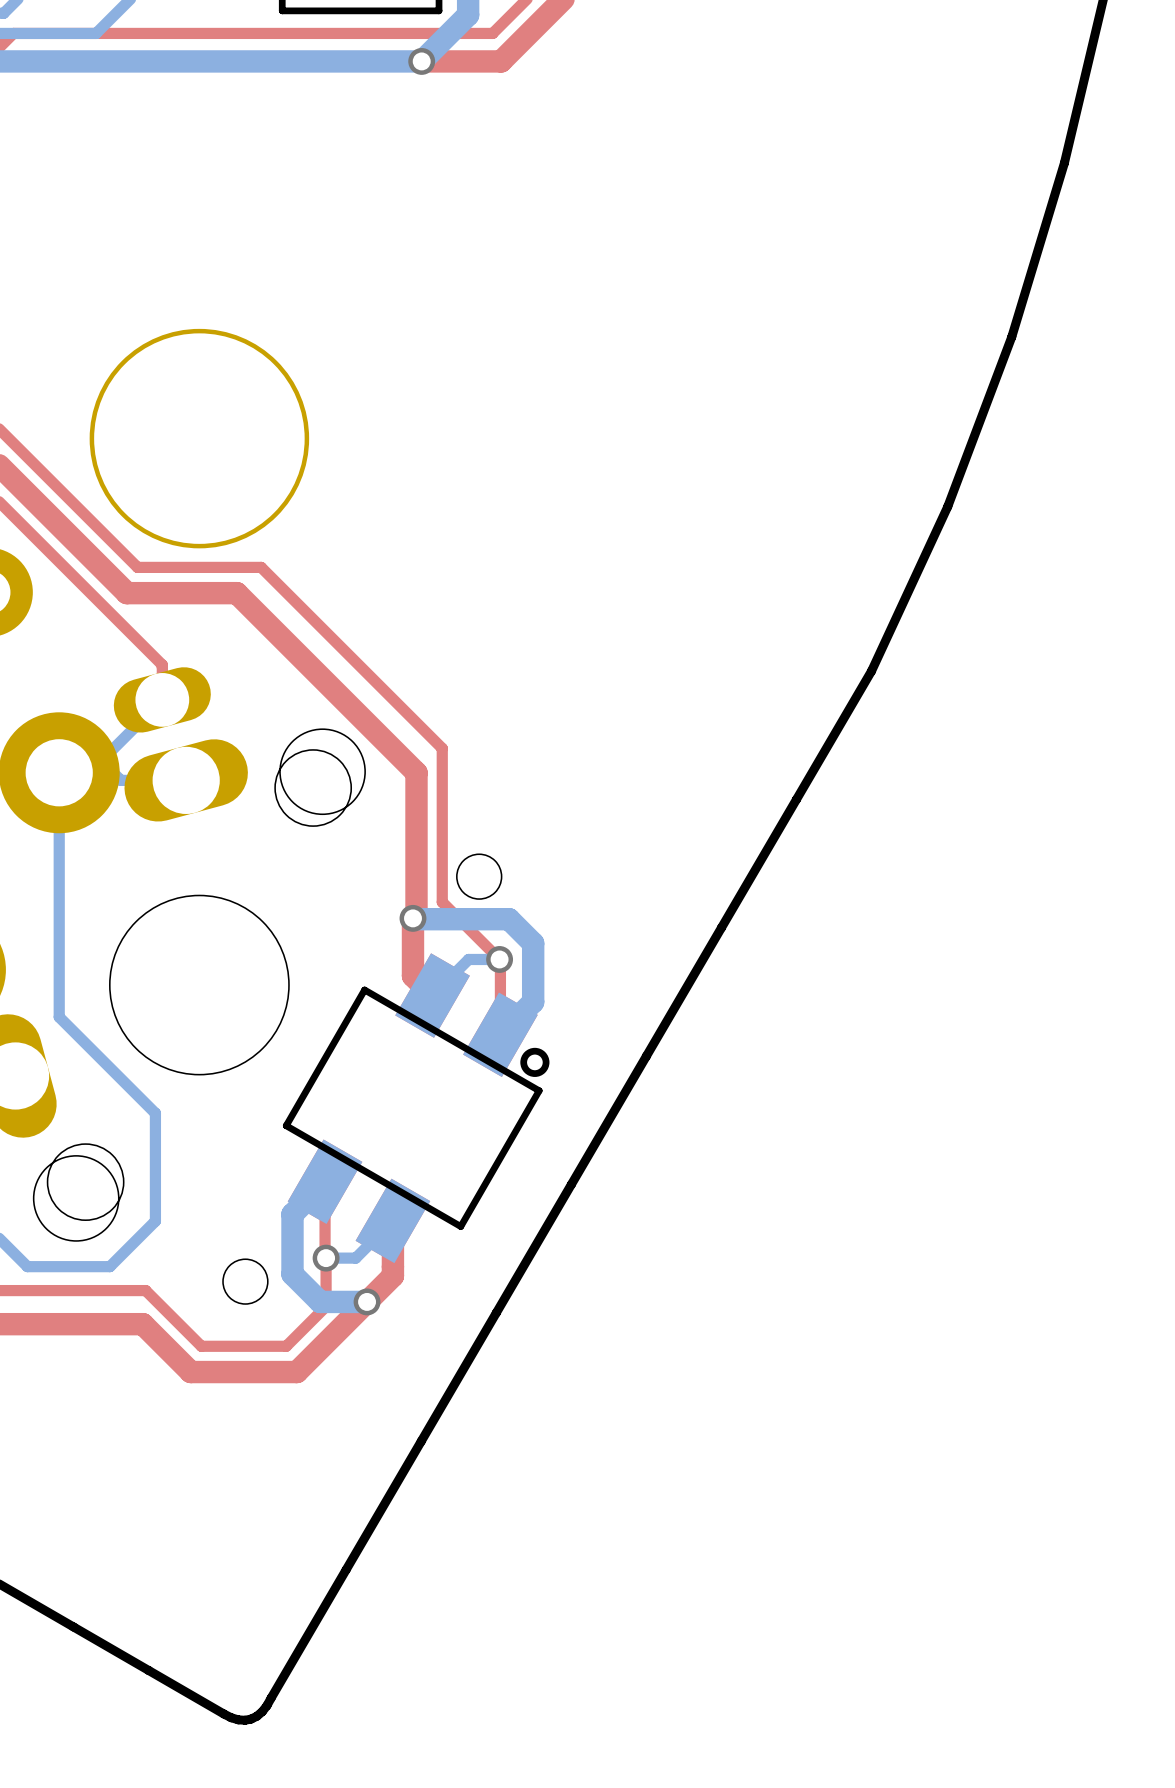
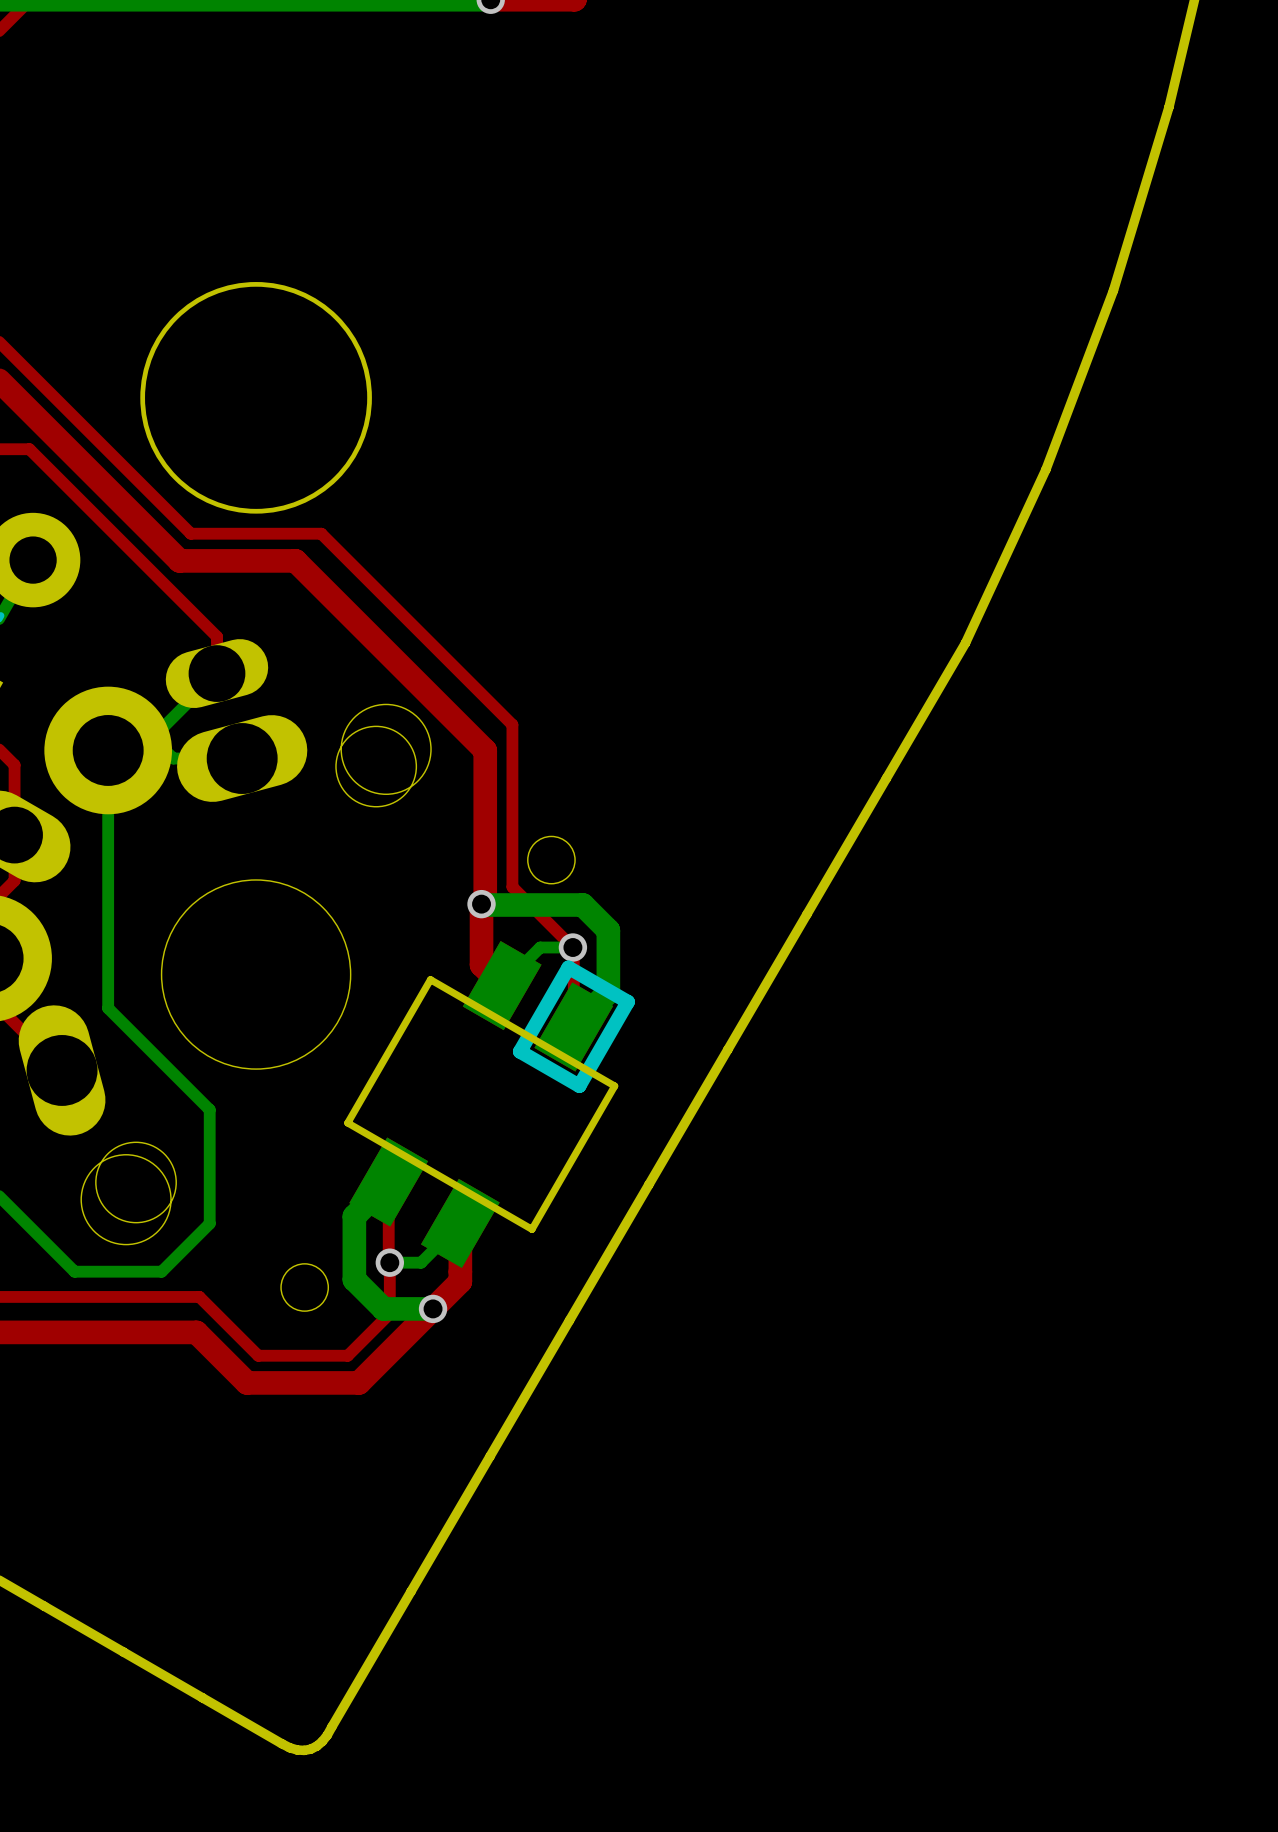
part footprint: [287, 953, 550, 1264] -> [349, 941, 635, 1269]

